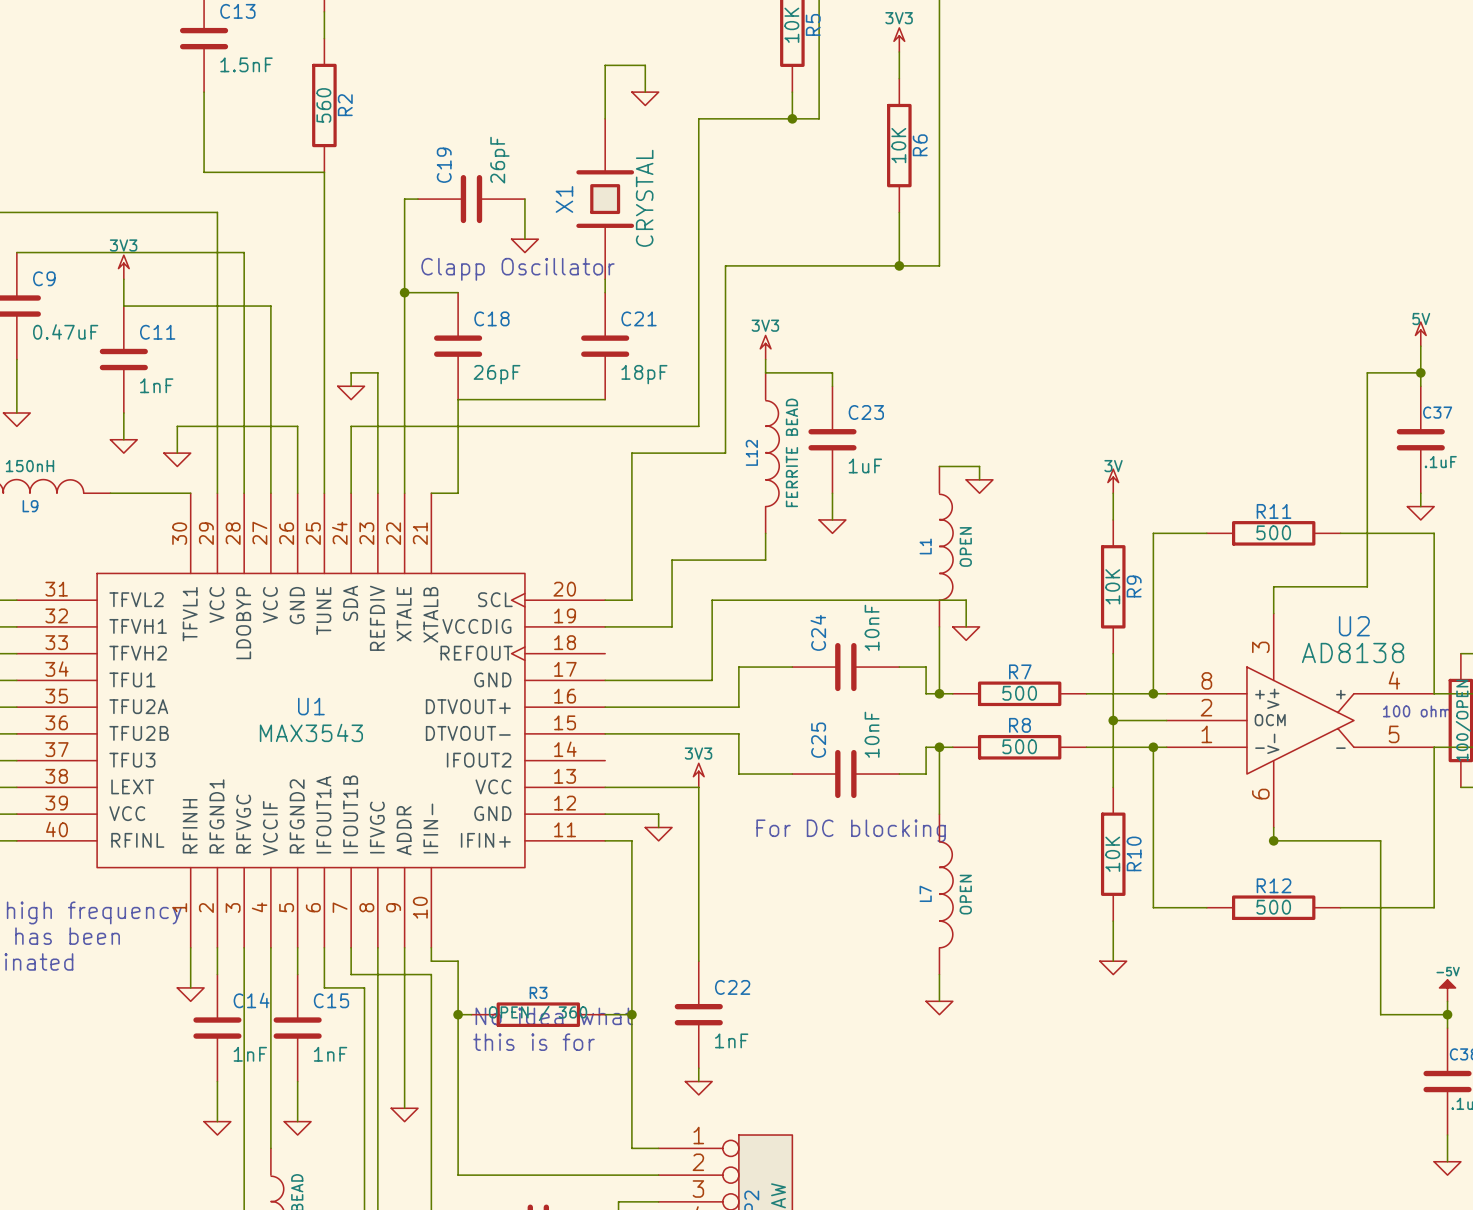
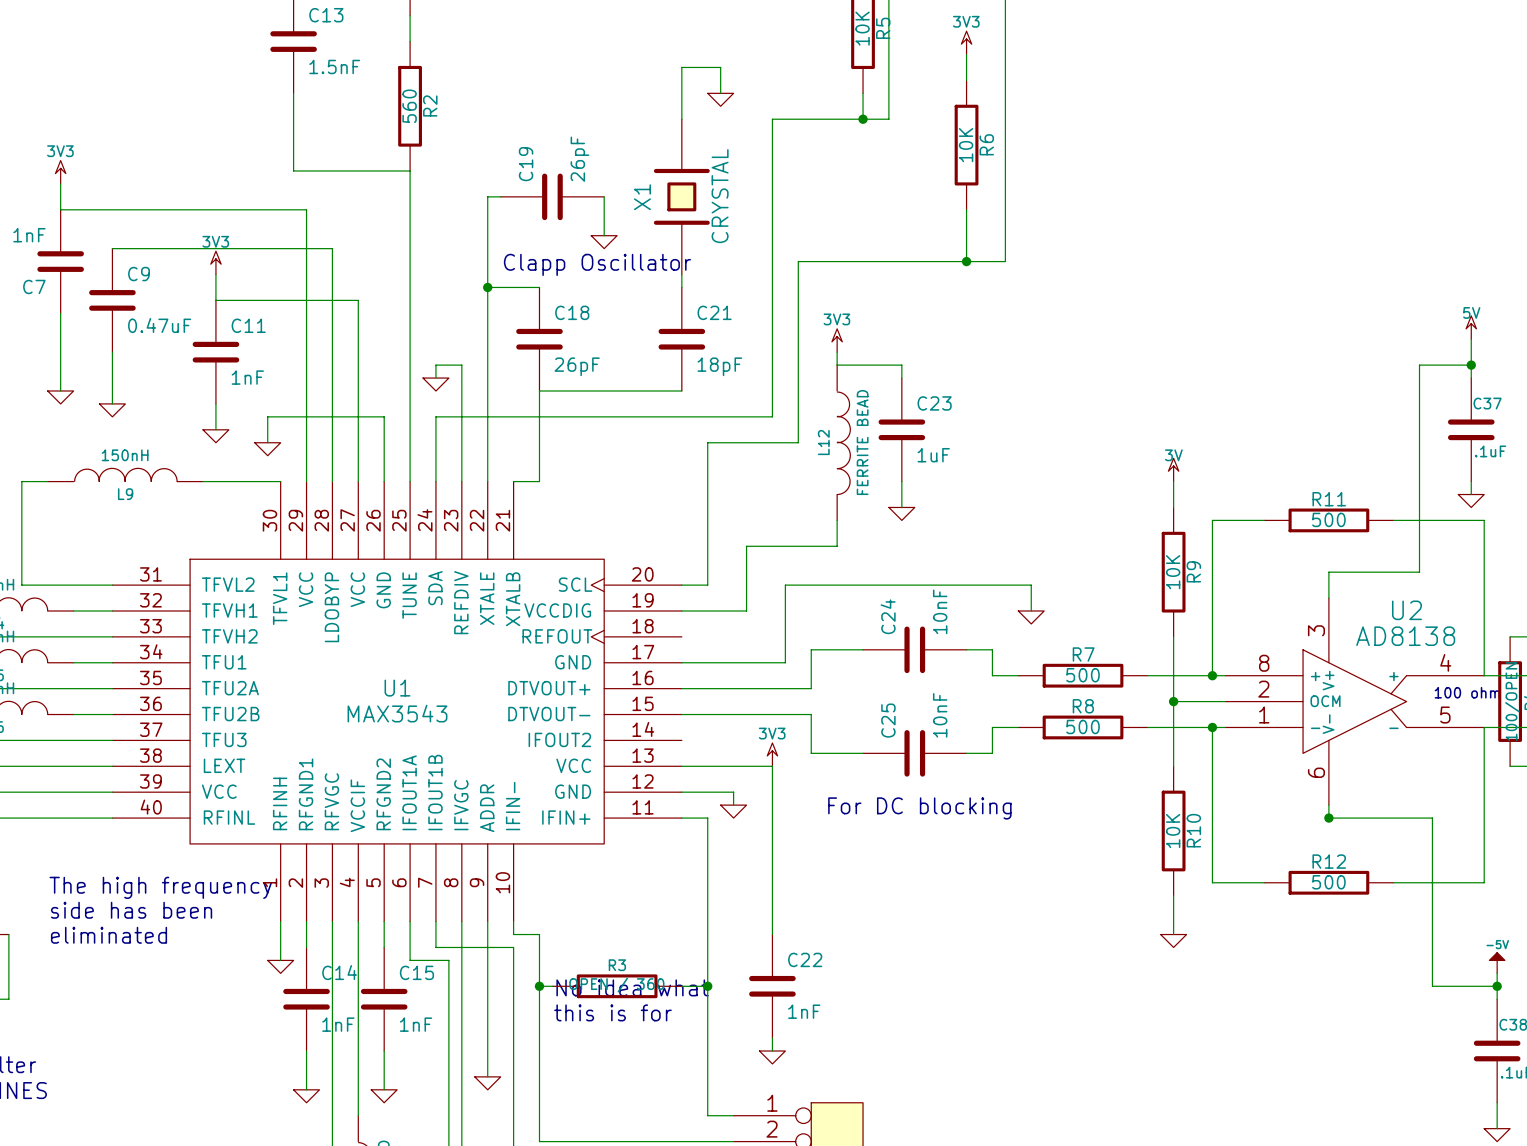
wire: (939, 466) (979, 466) (979, 479) -> none
power symbol: (979, 486) -> none
L1: OPEN (946, 546) -> none
wire: (939, 626) (939, 693) -> none
junction: (939, 693) -> none
wire: (939, 747) (939, 814) -> none
junction: (939, 747) -> none
L7: OPEN (946, 894) -> none
wire: (939, 974) (939, 1001) -> none
power symbol: (939, 1007) -> none

